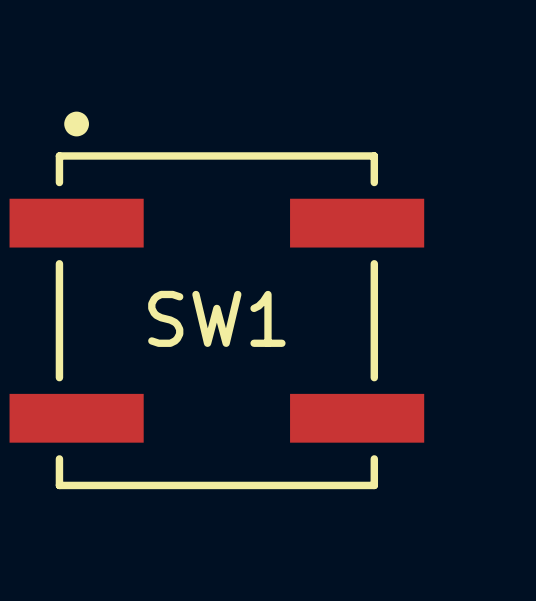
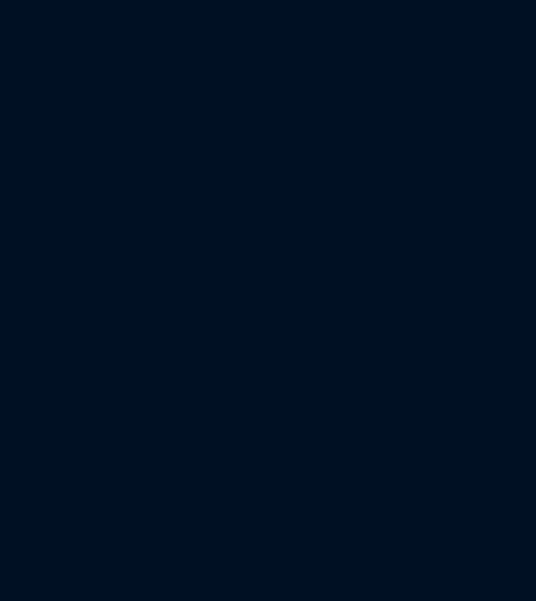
SW1: (216, 300) -> none

